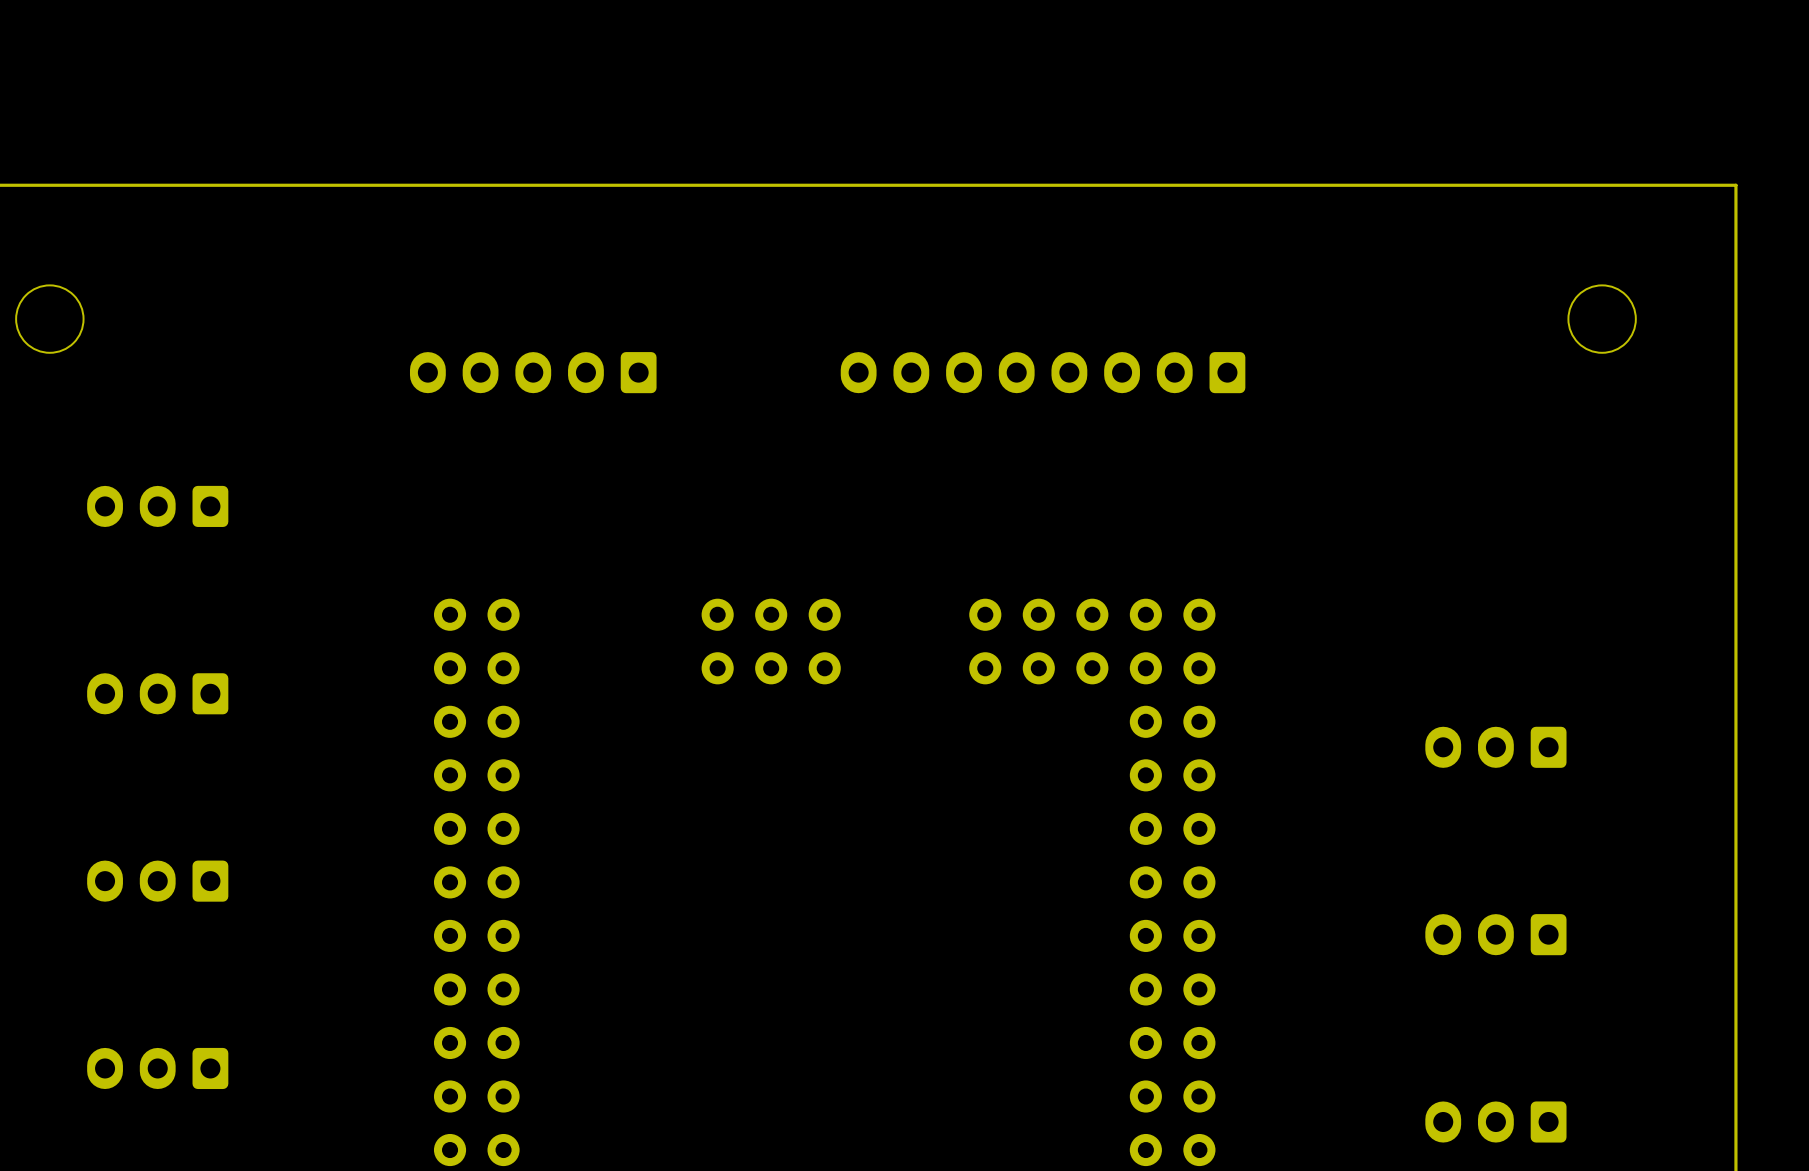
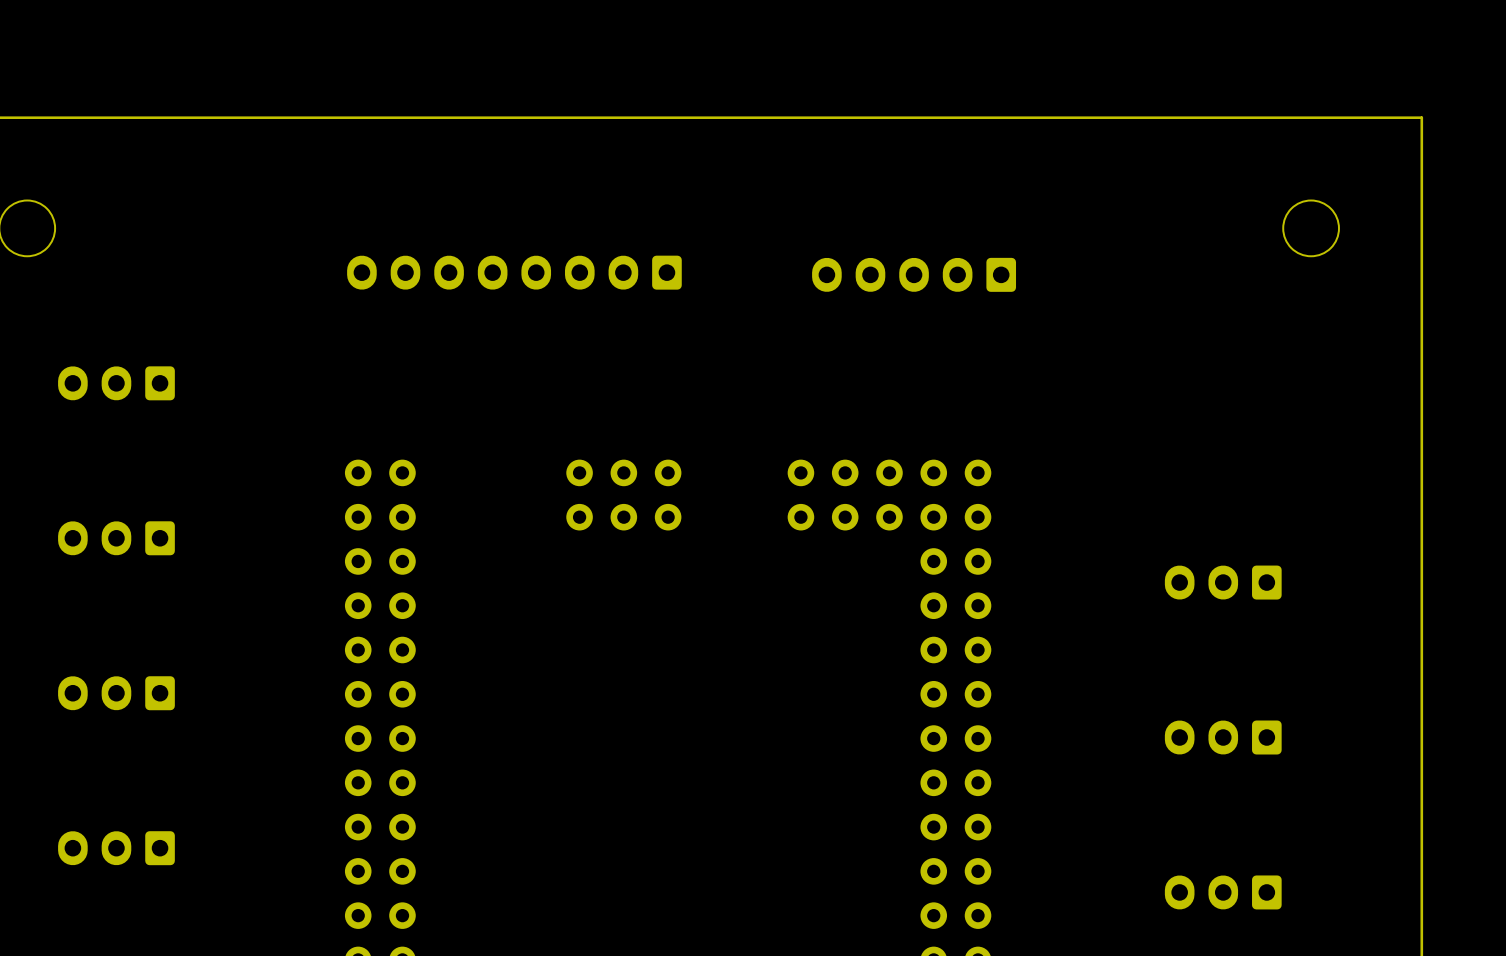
part: (533, 372) -> none
part position: (1043, 372) -> (514, 272)
part: none -> (914, 274)

